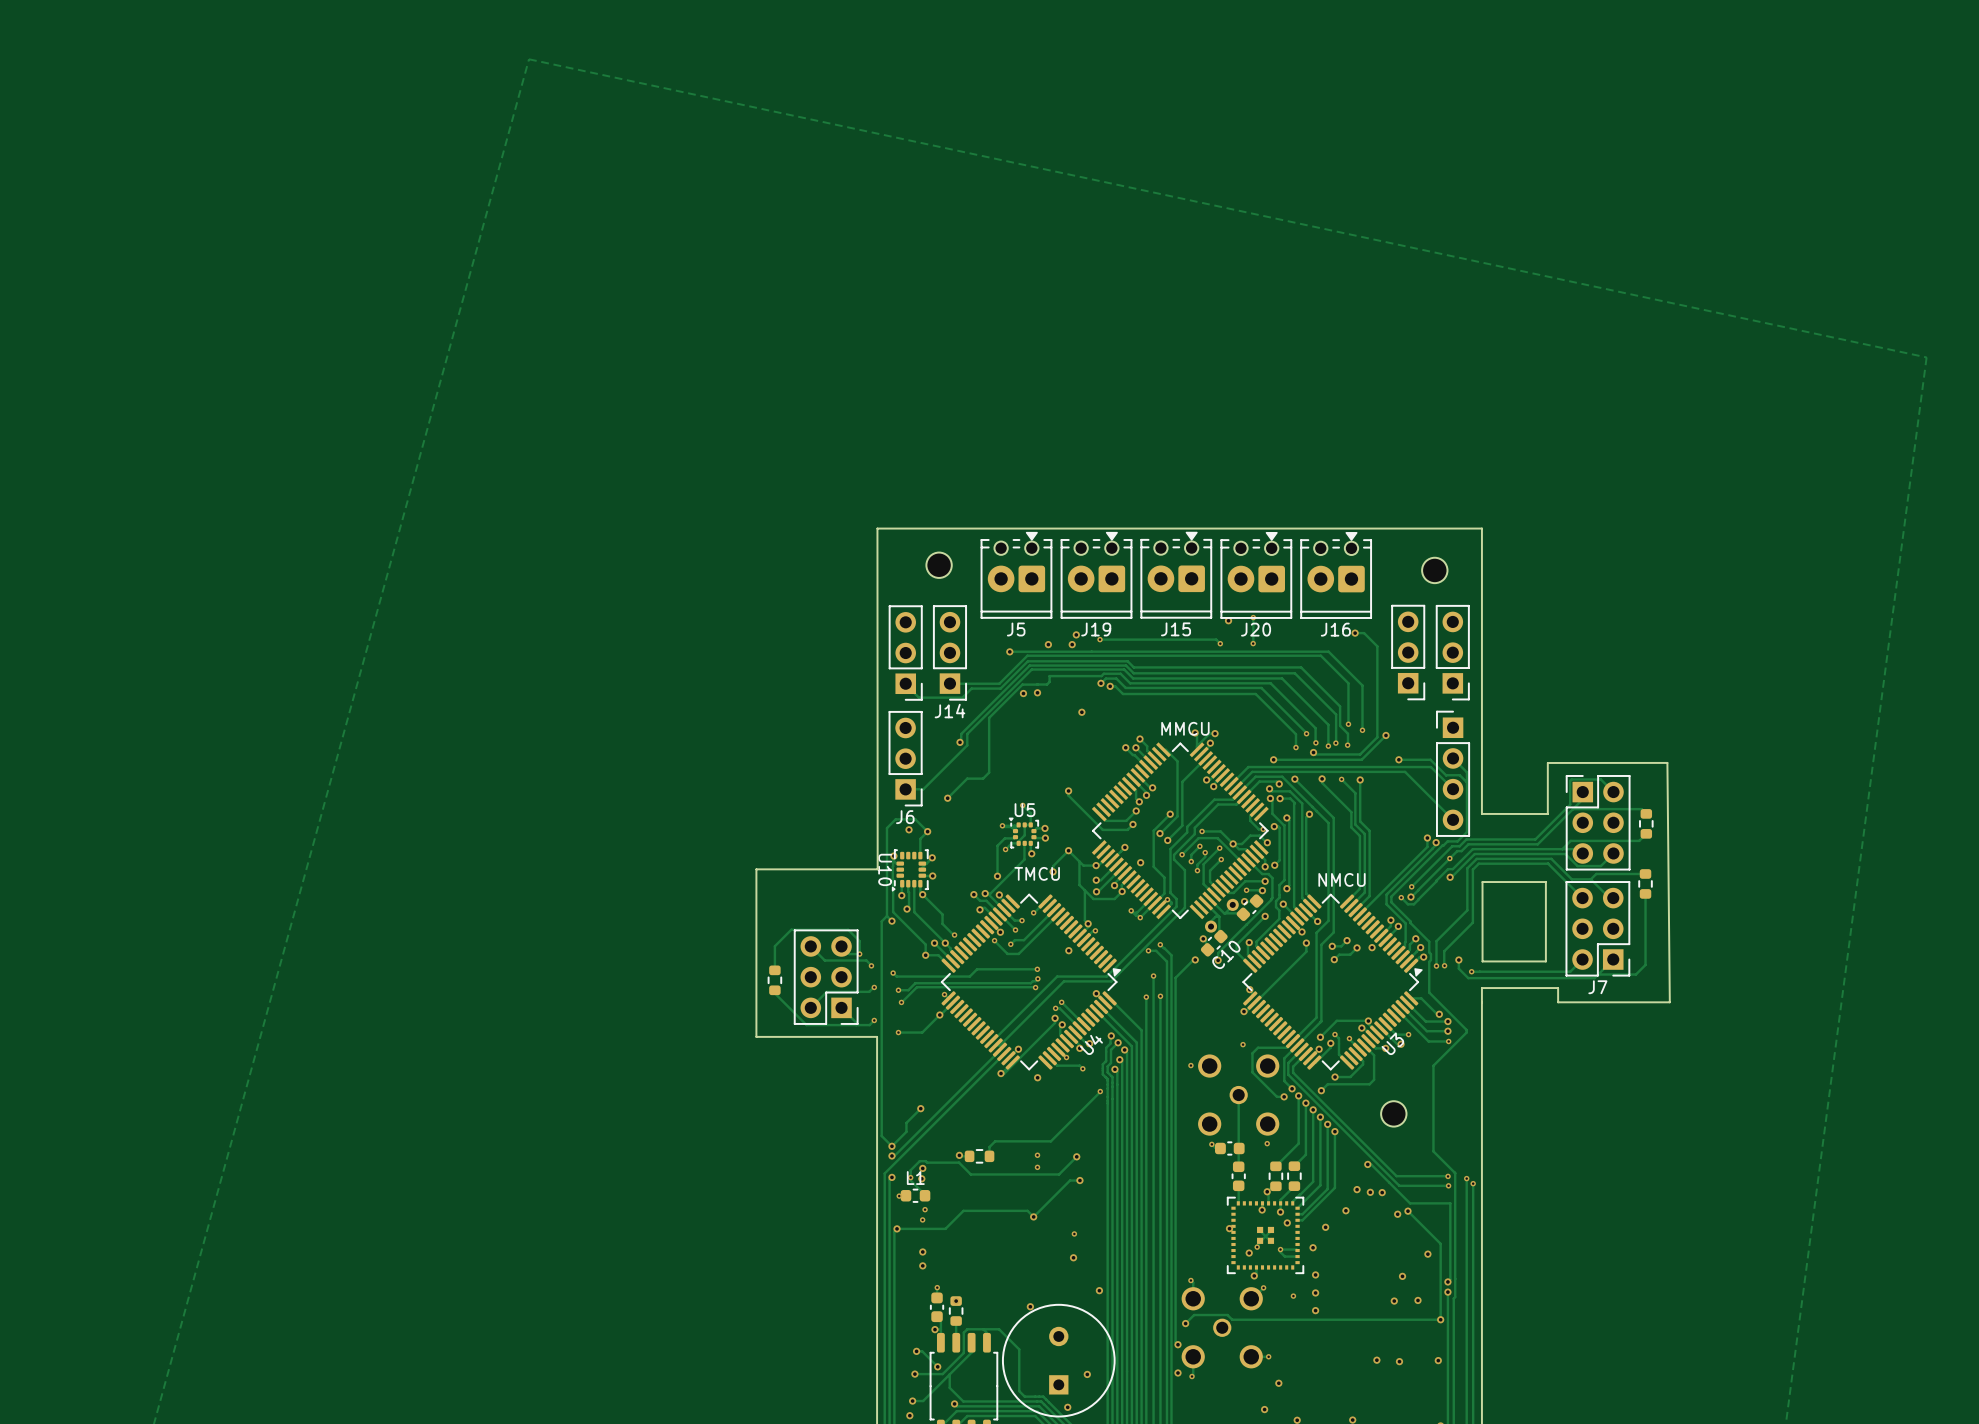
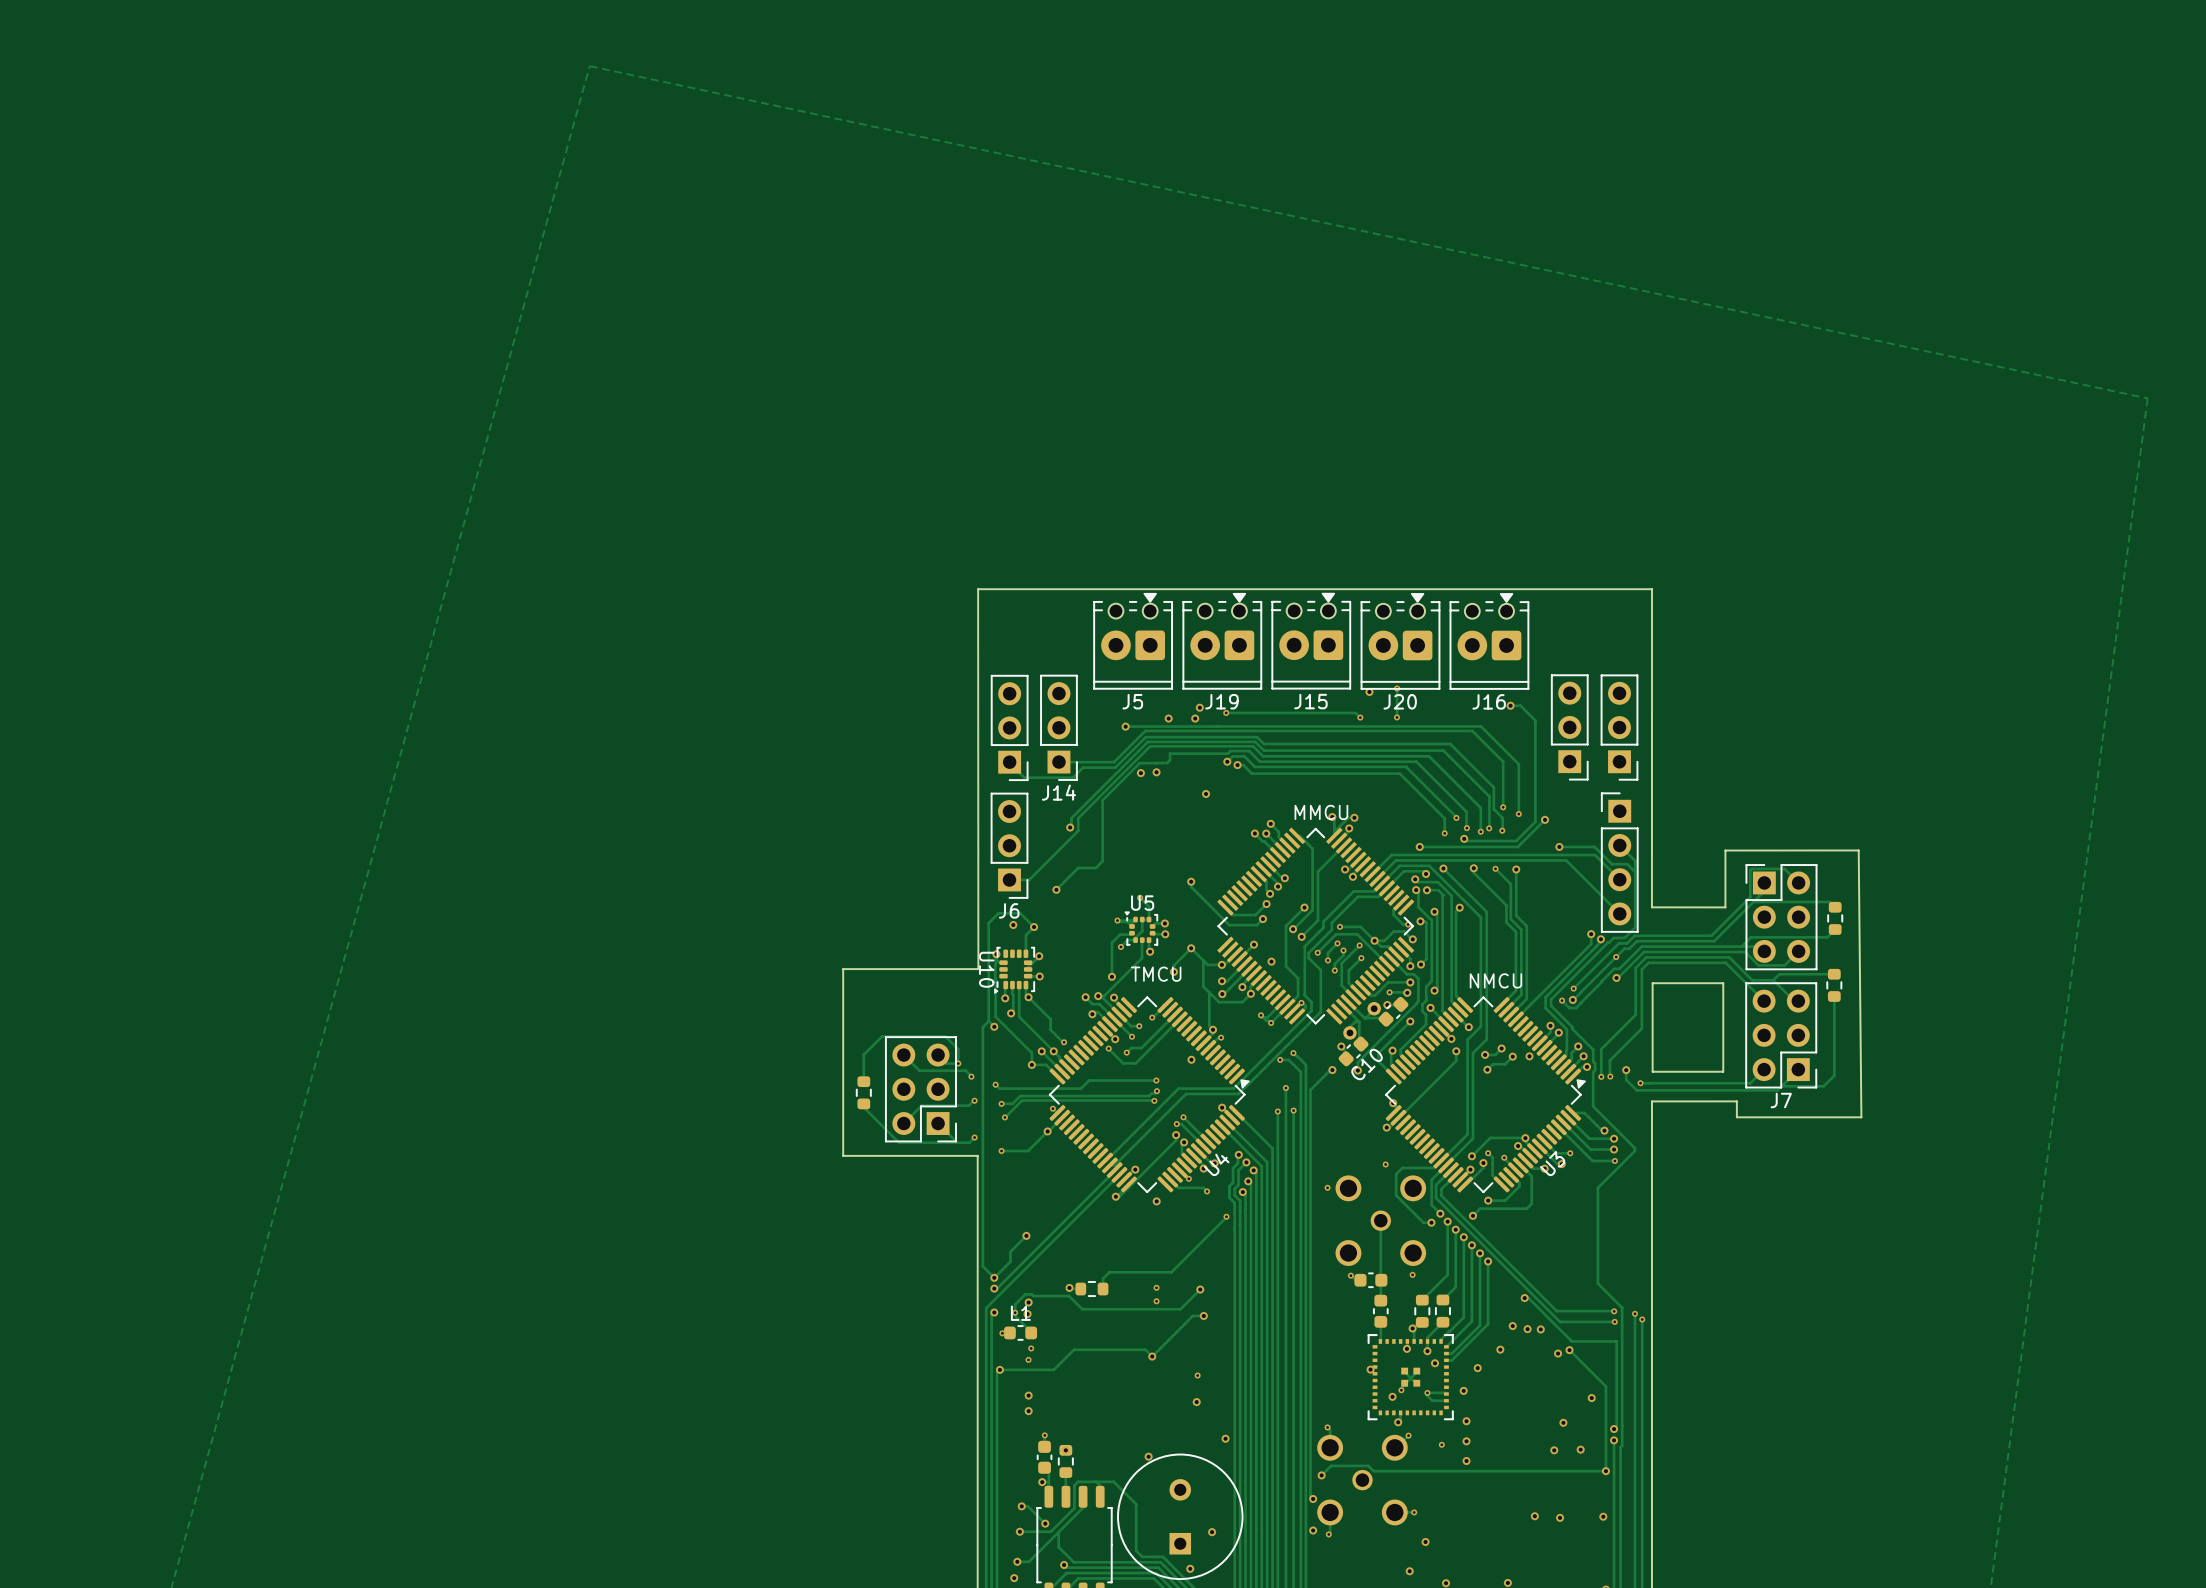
part: (939, 565) -> none
part: (1434, 570) -> none
part: (1393, 1113) -> none

